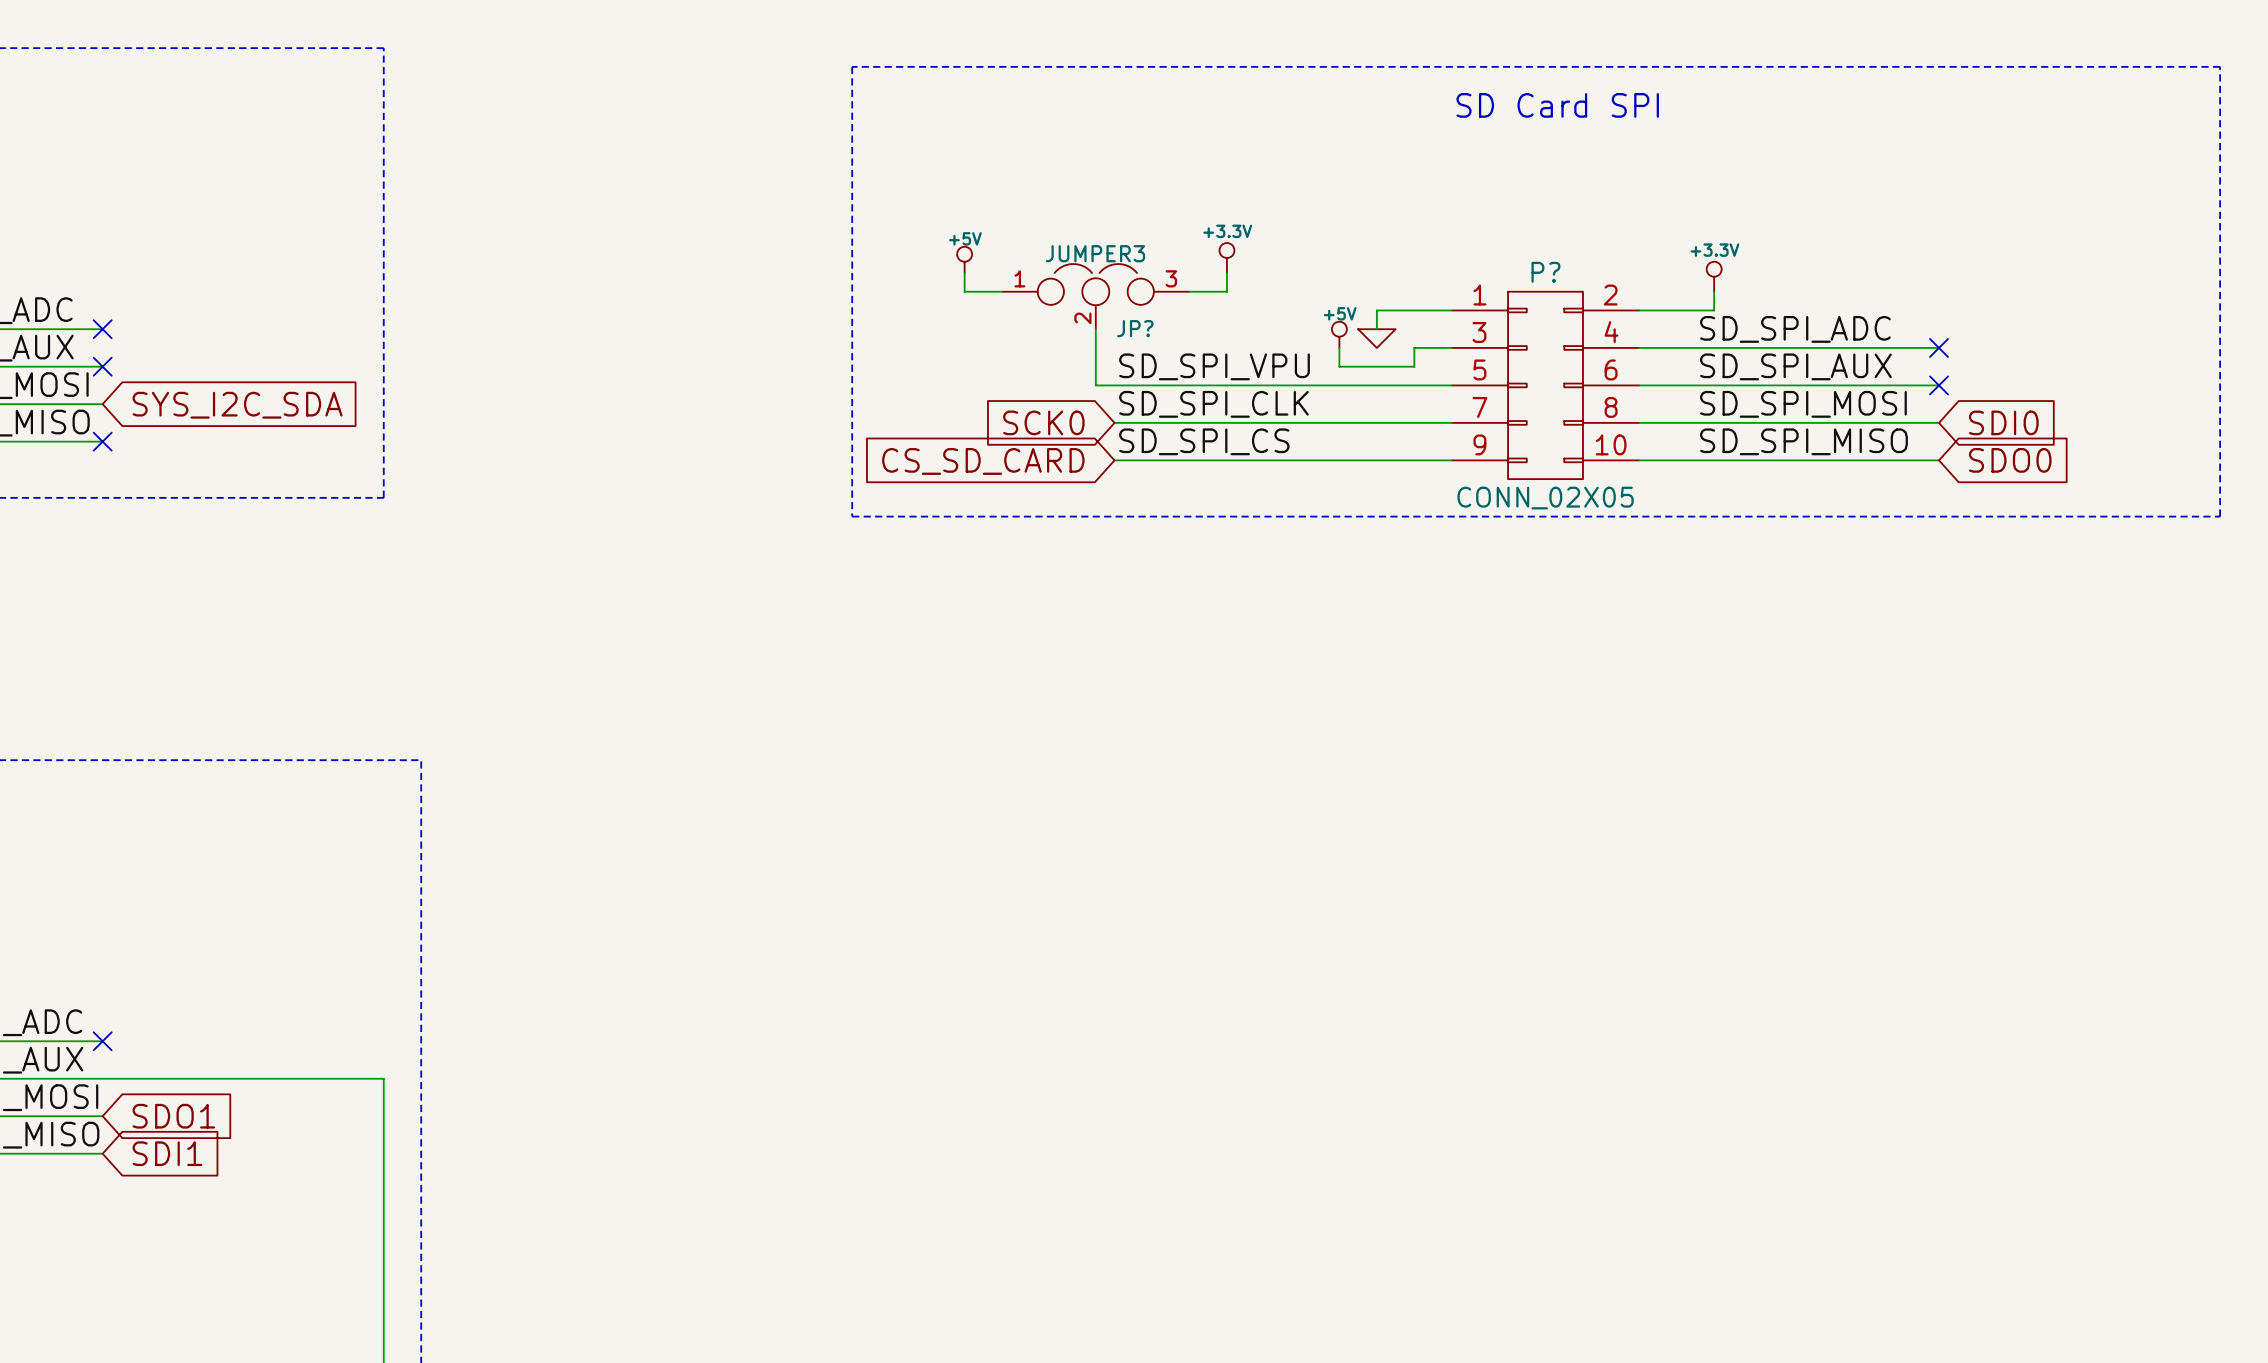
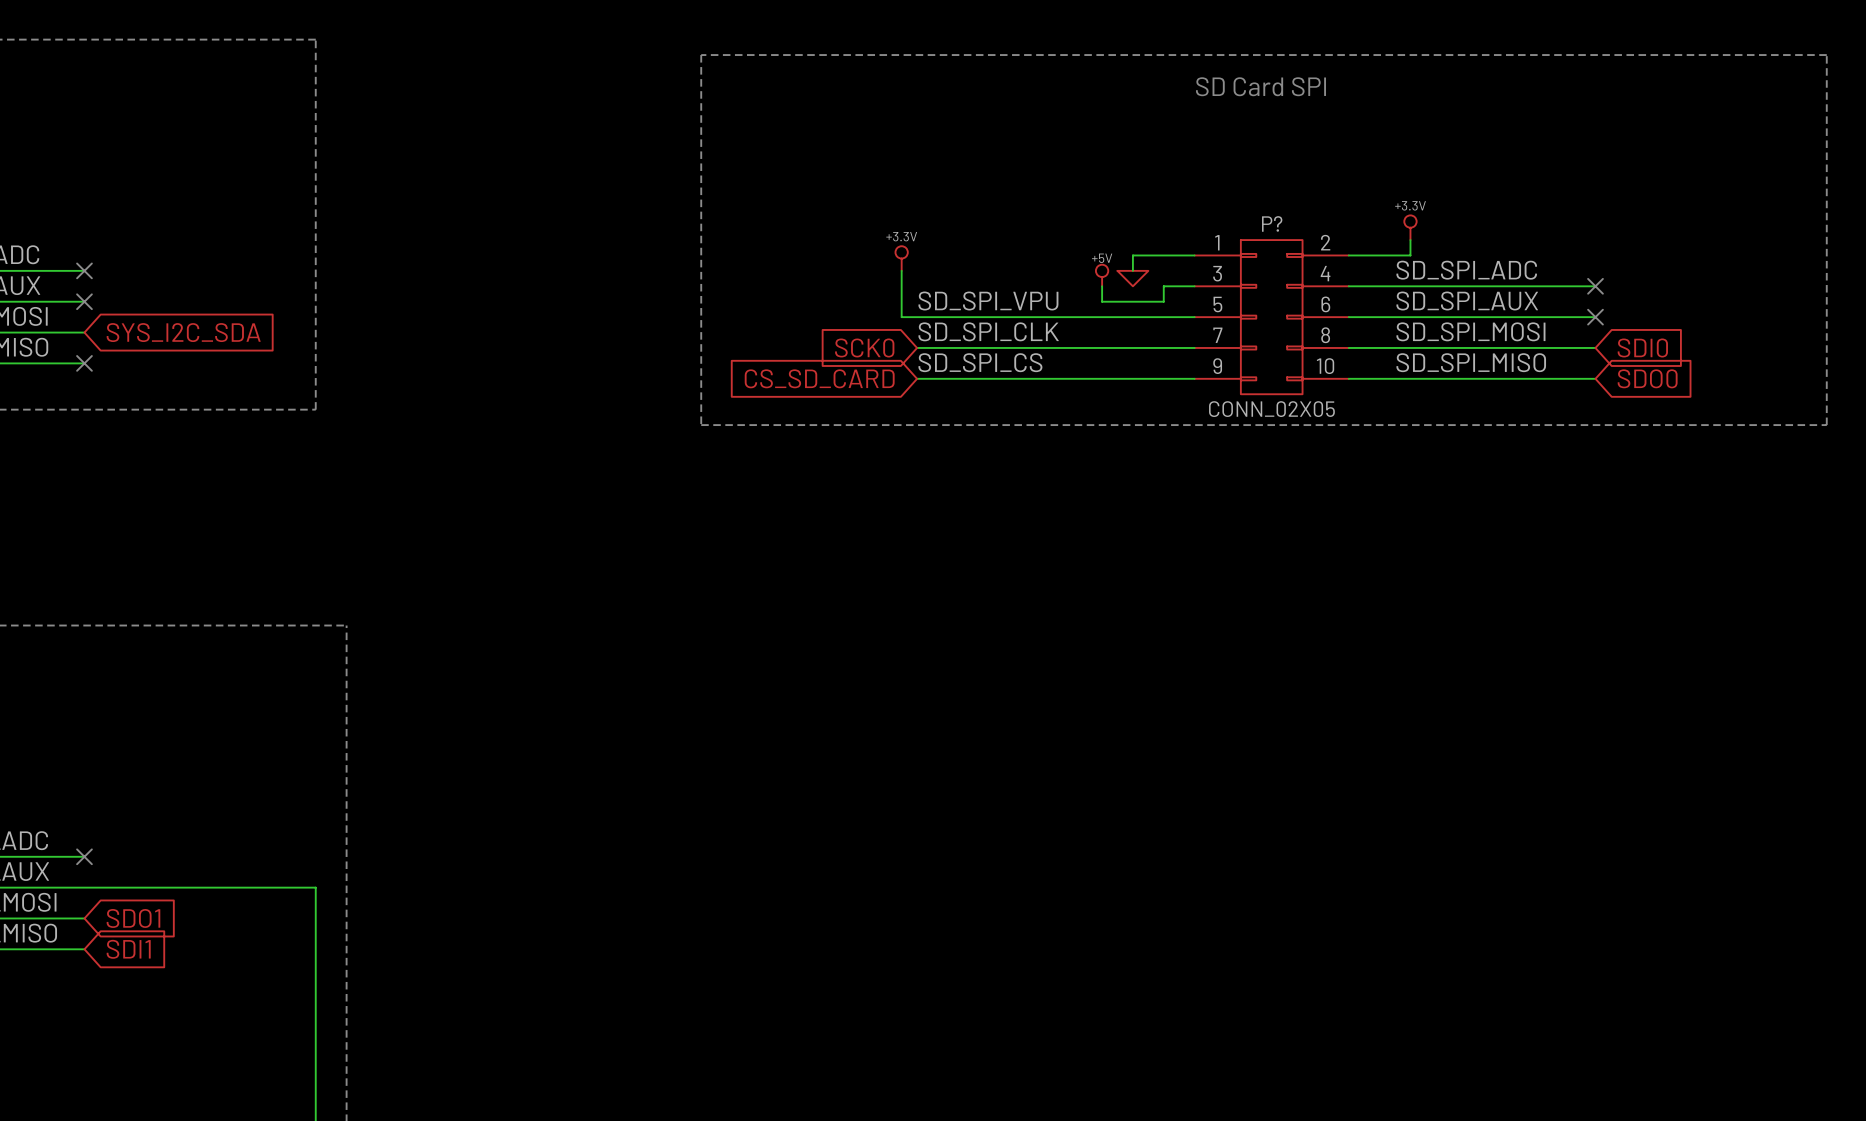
power symbol position: +3.3V (1226, 258) -> +3.3V (901, 258)
power symbol: +5V (964, 259) -> none
wire: (964, 273) (964, 291) (1002, 291) -> none
wire: (1226, 273) (1226, 291) (1189, 291) -> none
JP?: JUMPER3 (1095, 296) -> none

